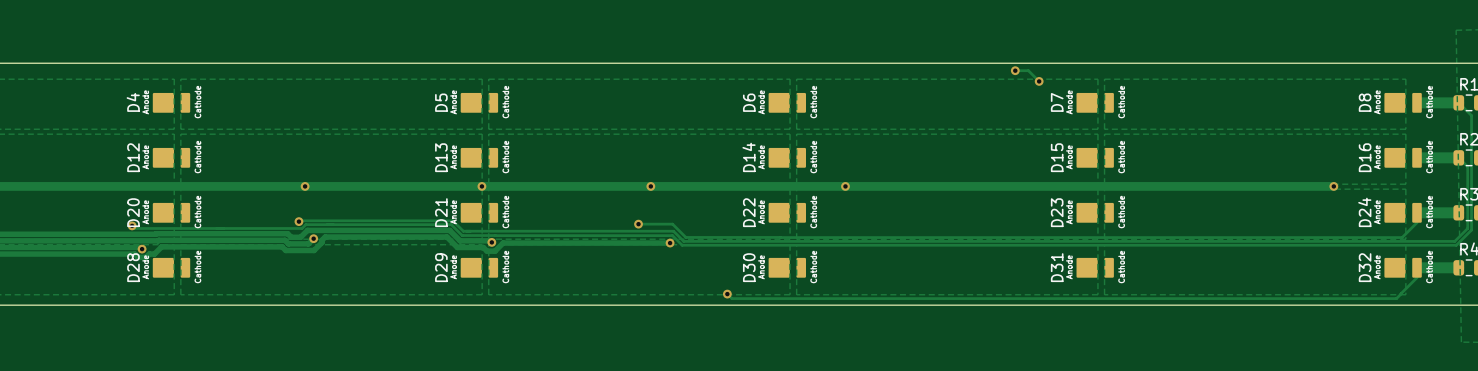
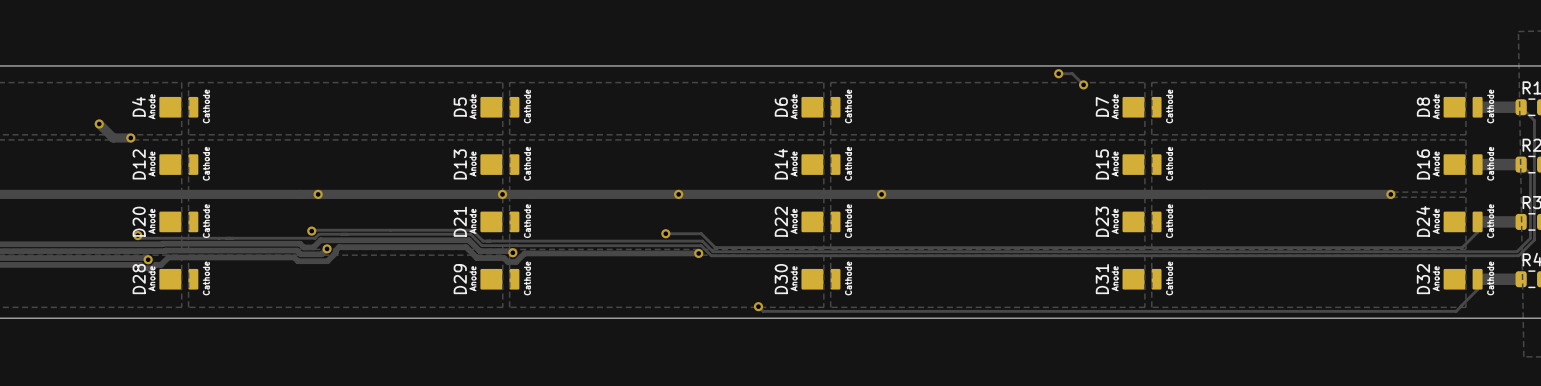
track: none -> (99, 123) (113, 137) (130, 137)
via: none -> (99, 123)
via: none -> (130, 137)

